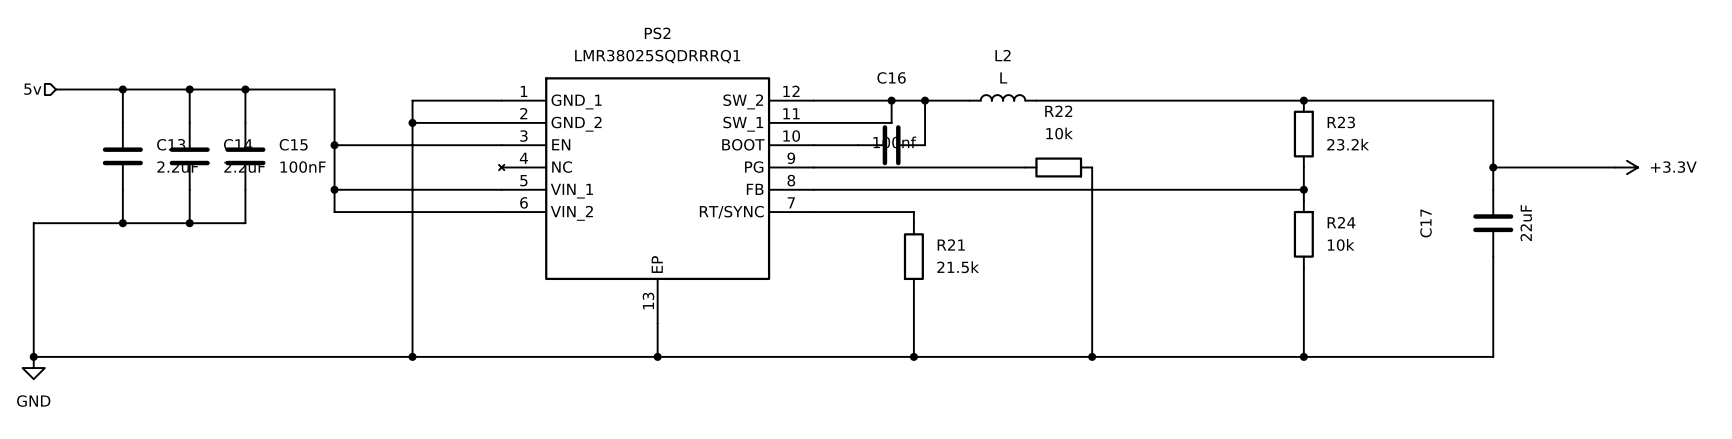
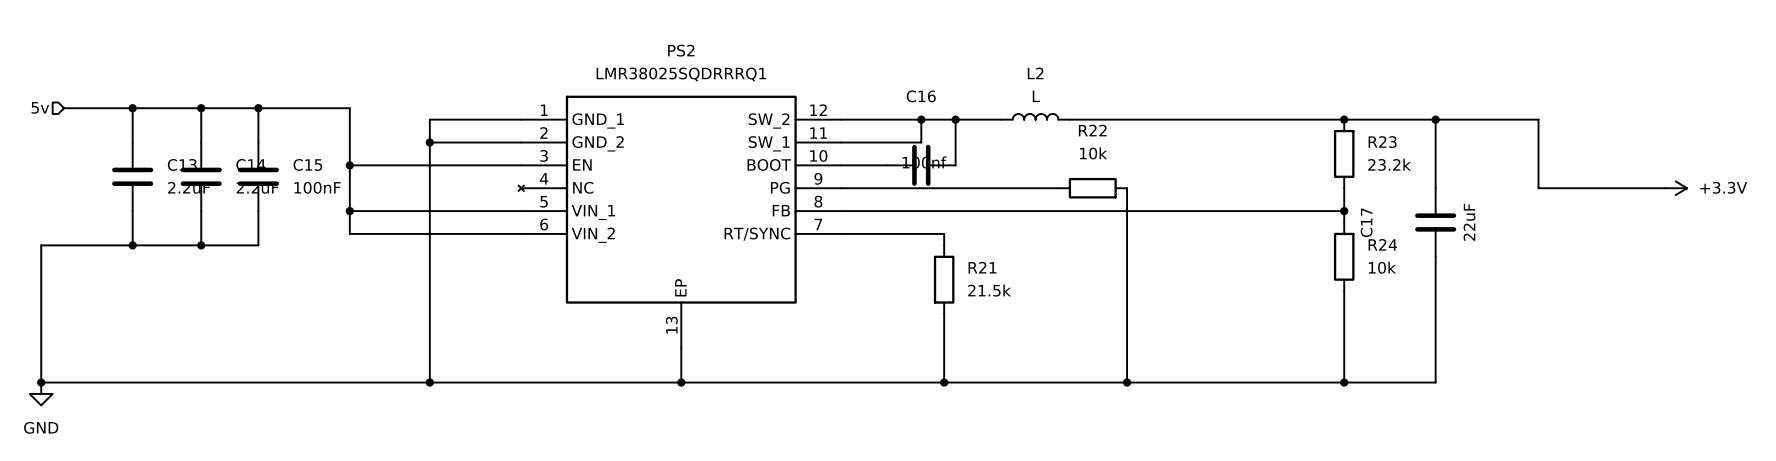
wire: none -> (1435, 119) (1435, 188)
junction: none -> (1435, 119)
wire: (1493, 167) (1493, 189) -> none
junction: (1493, 167) -> none
C17 position: (1493, 223) -> (1435, 222)
wire: (1493, 256) (1493, 356) (1392, 356) -> (1435, 256) (1435, 382)

